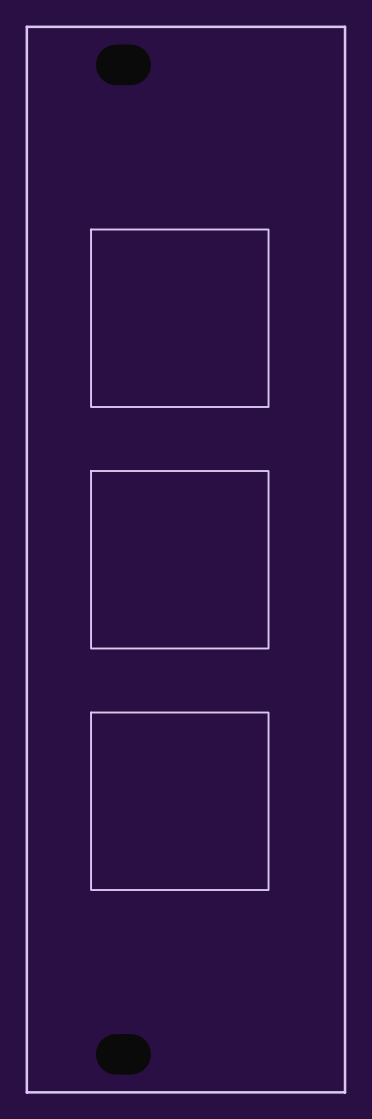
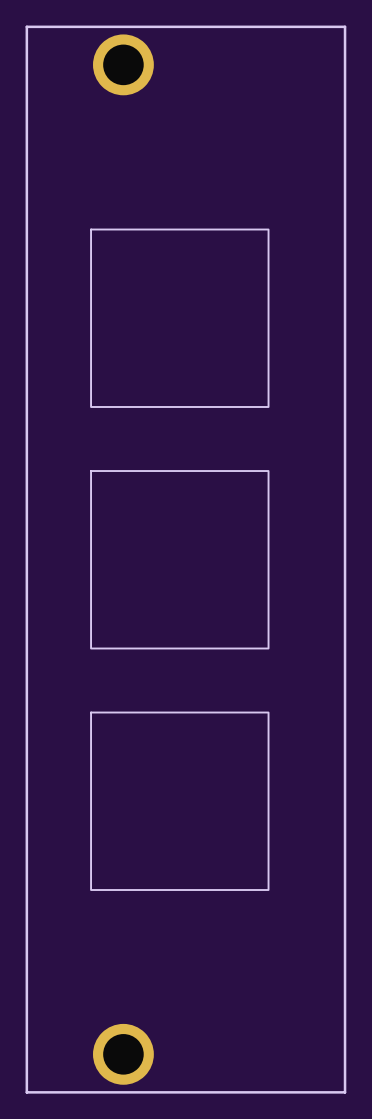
part footprint: [95, 44, 151, 86] -> [93, 34, 154, 96]
part footprint: [95, 1034, 151, 1075] -> [93, 1023, 154, 1085]

